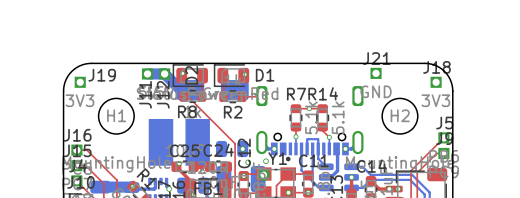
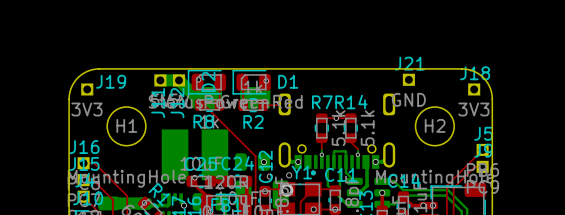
via: (295, 136) -> none
via: (329, 137) -> none
via: none -> (321, 154)
via: none -> (357, 154)

